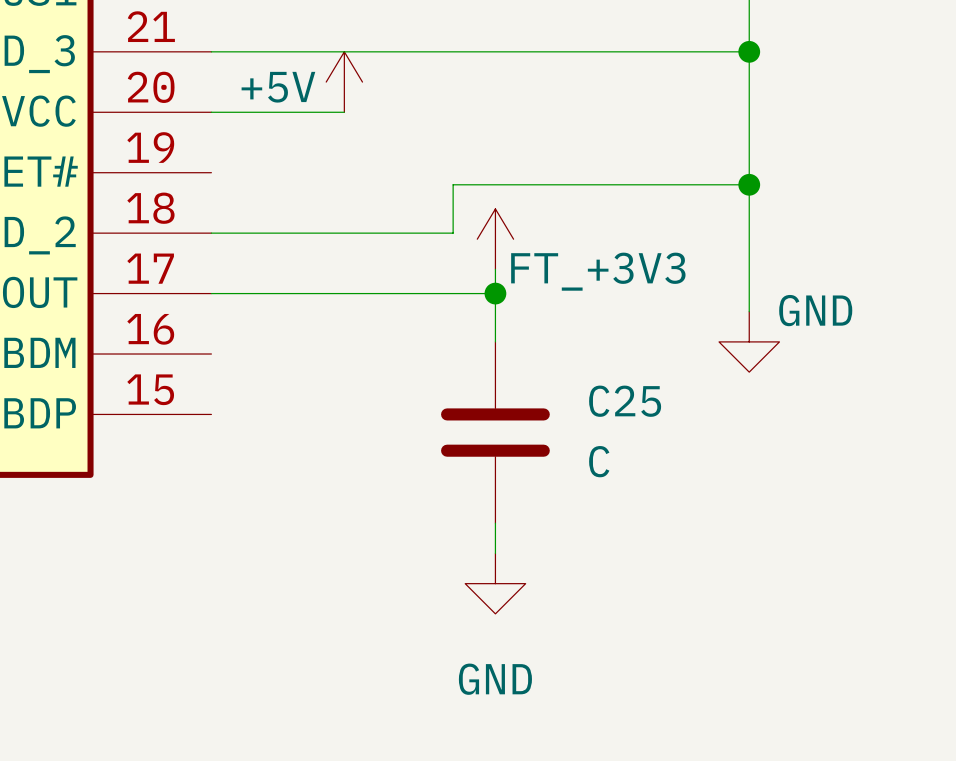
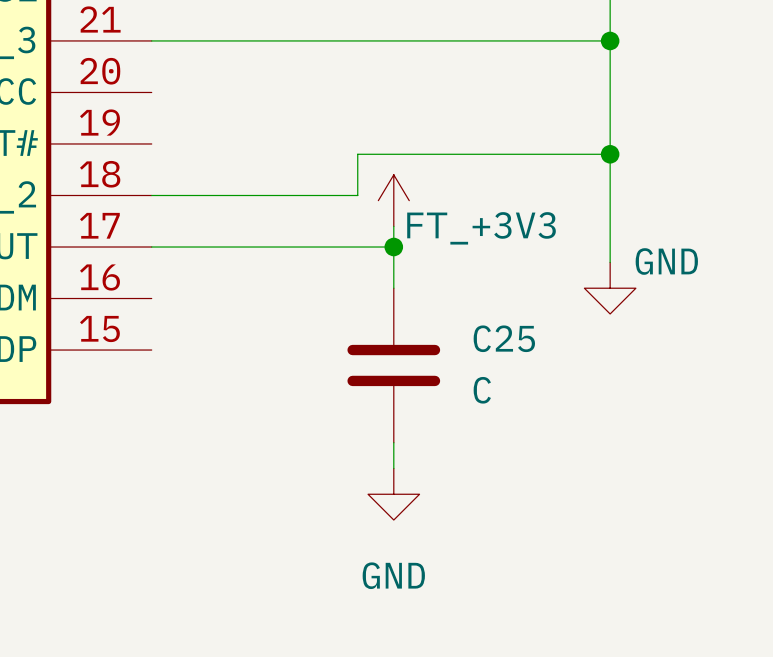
power symbol: +5V (344, 82) -> none
wire: (211, 112) (344, 112) -> none

